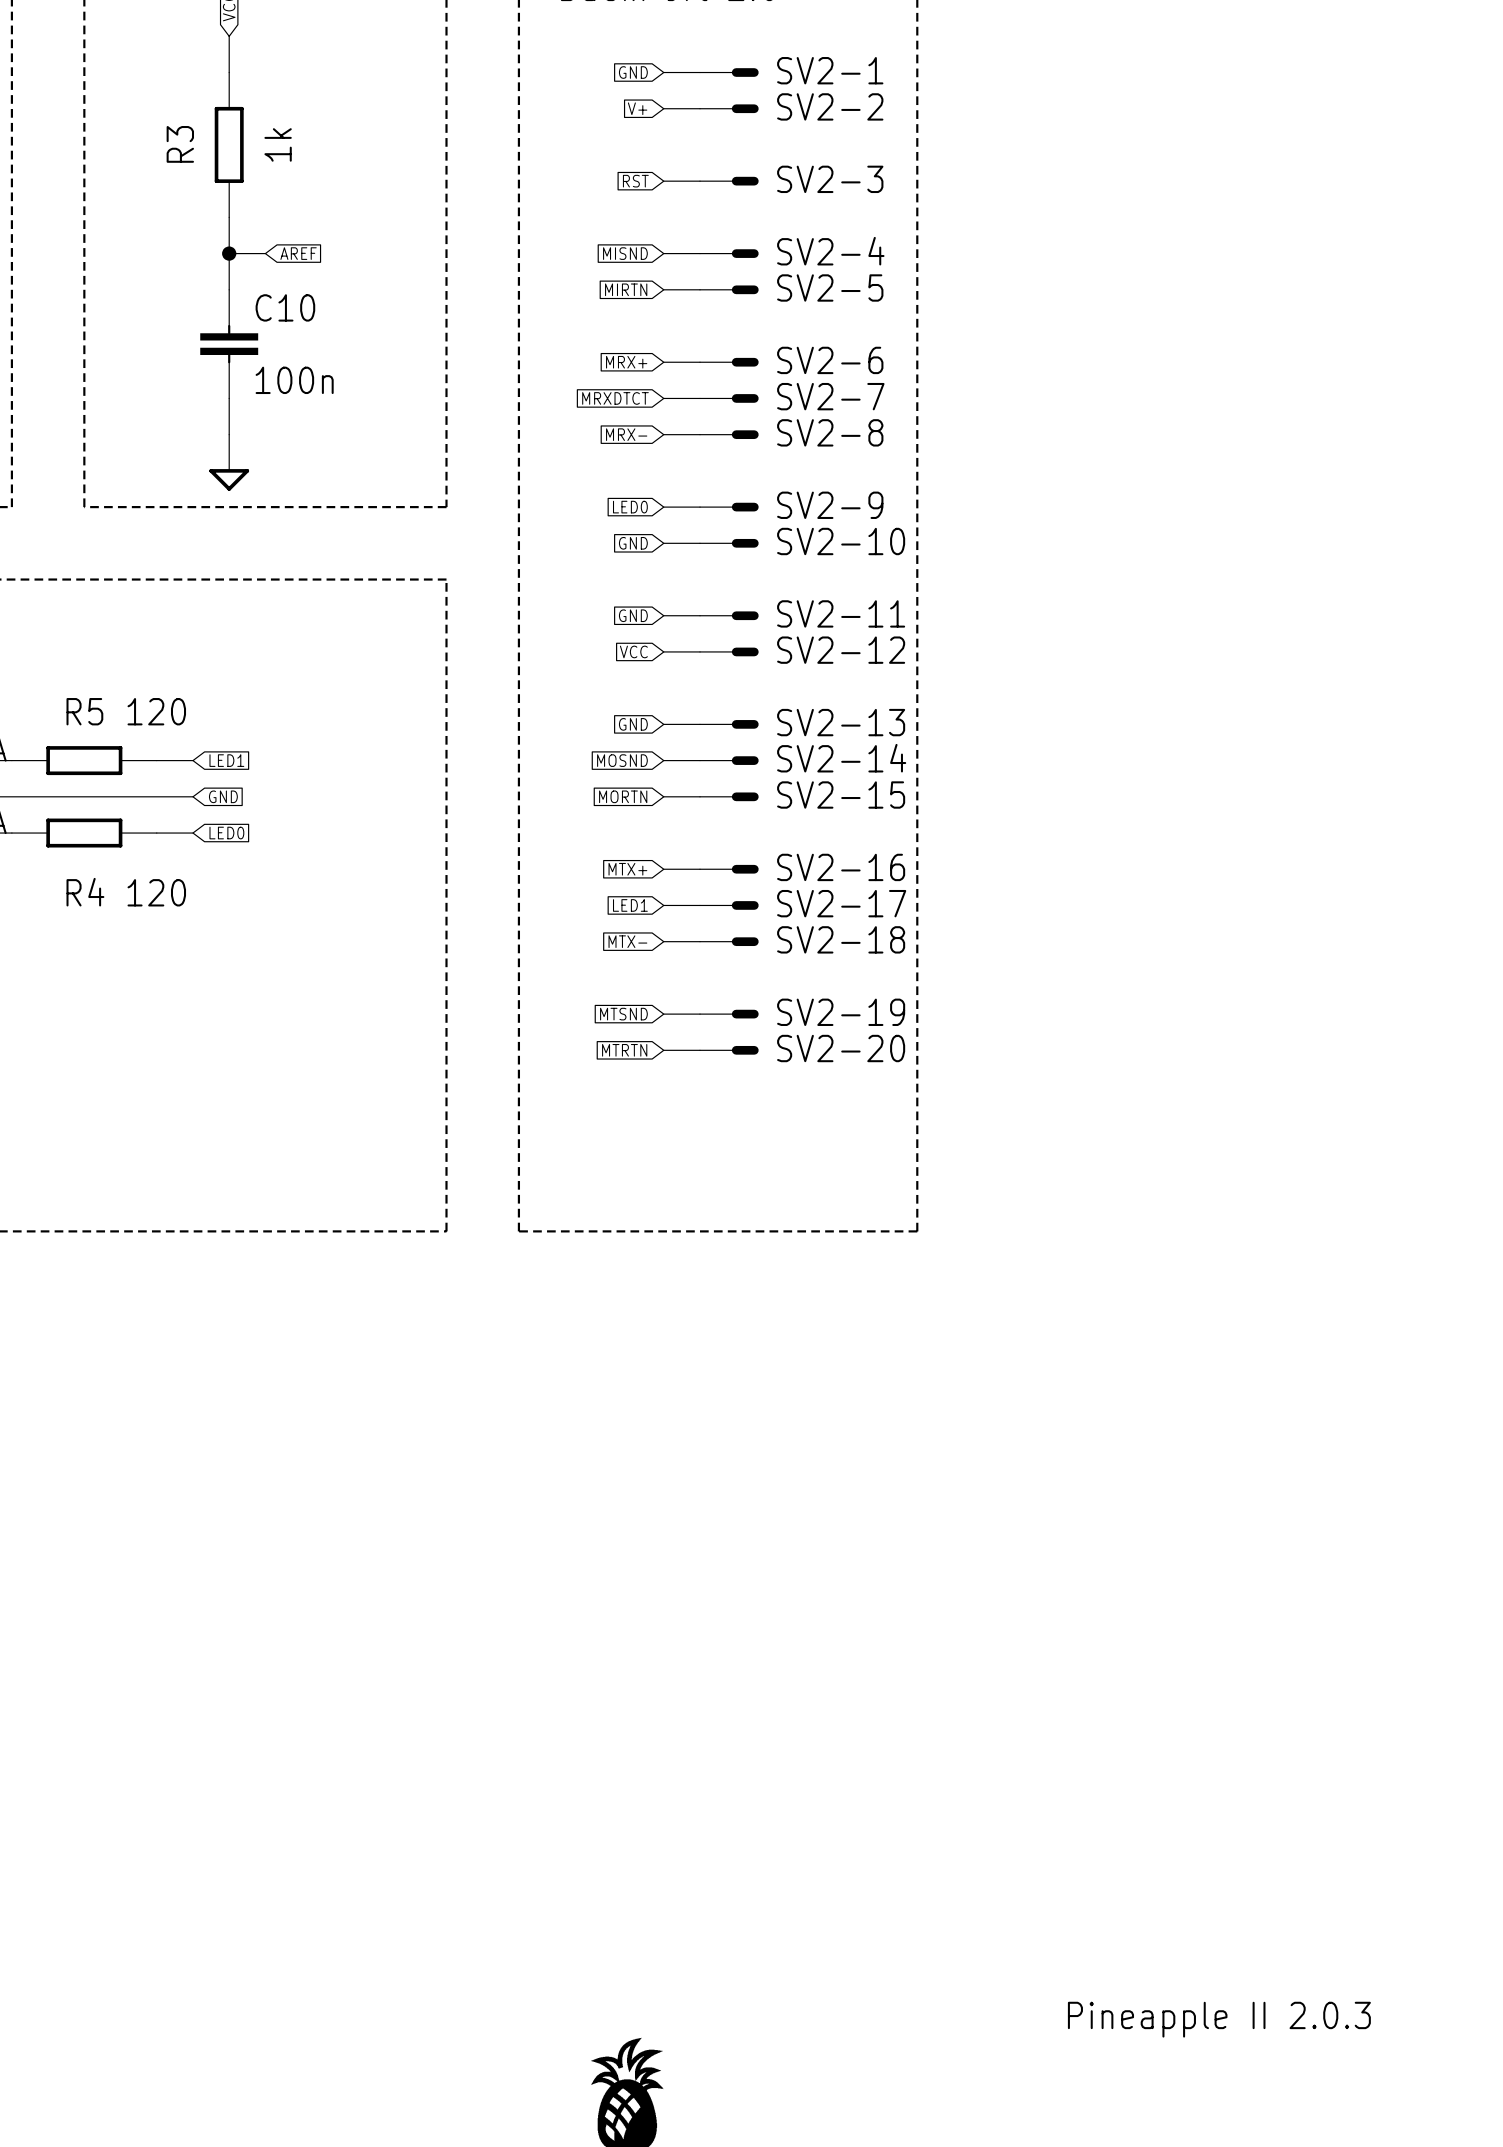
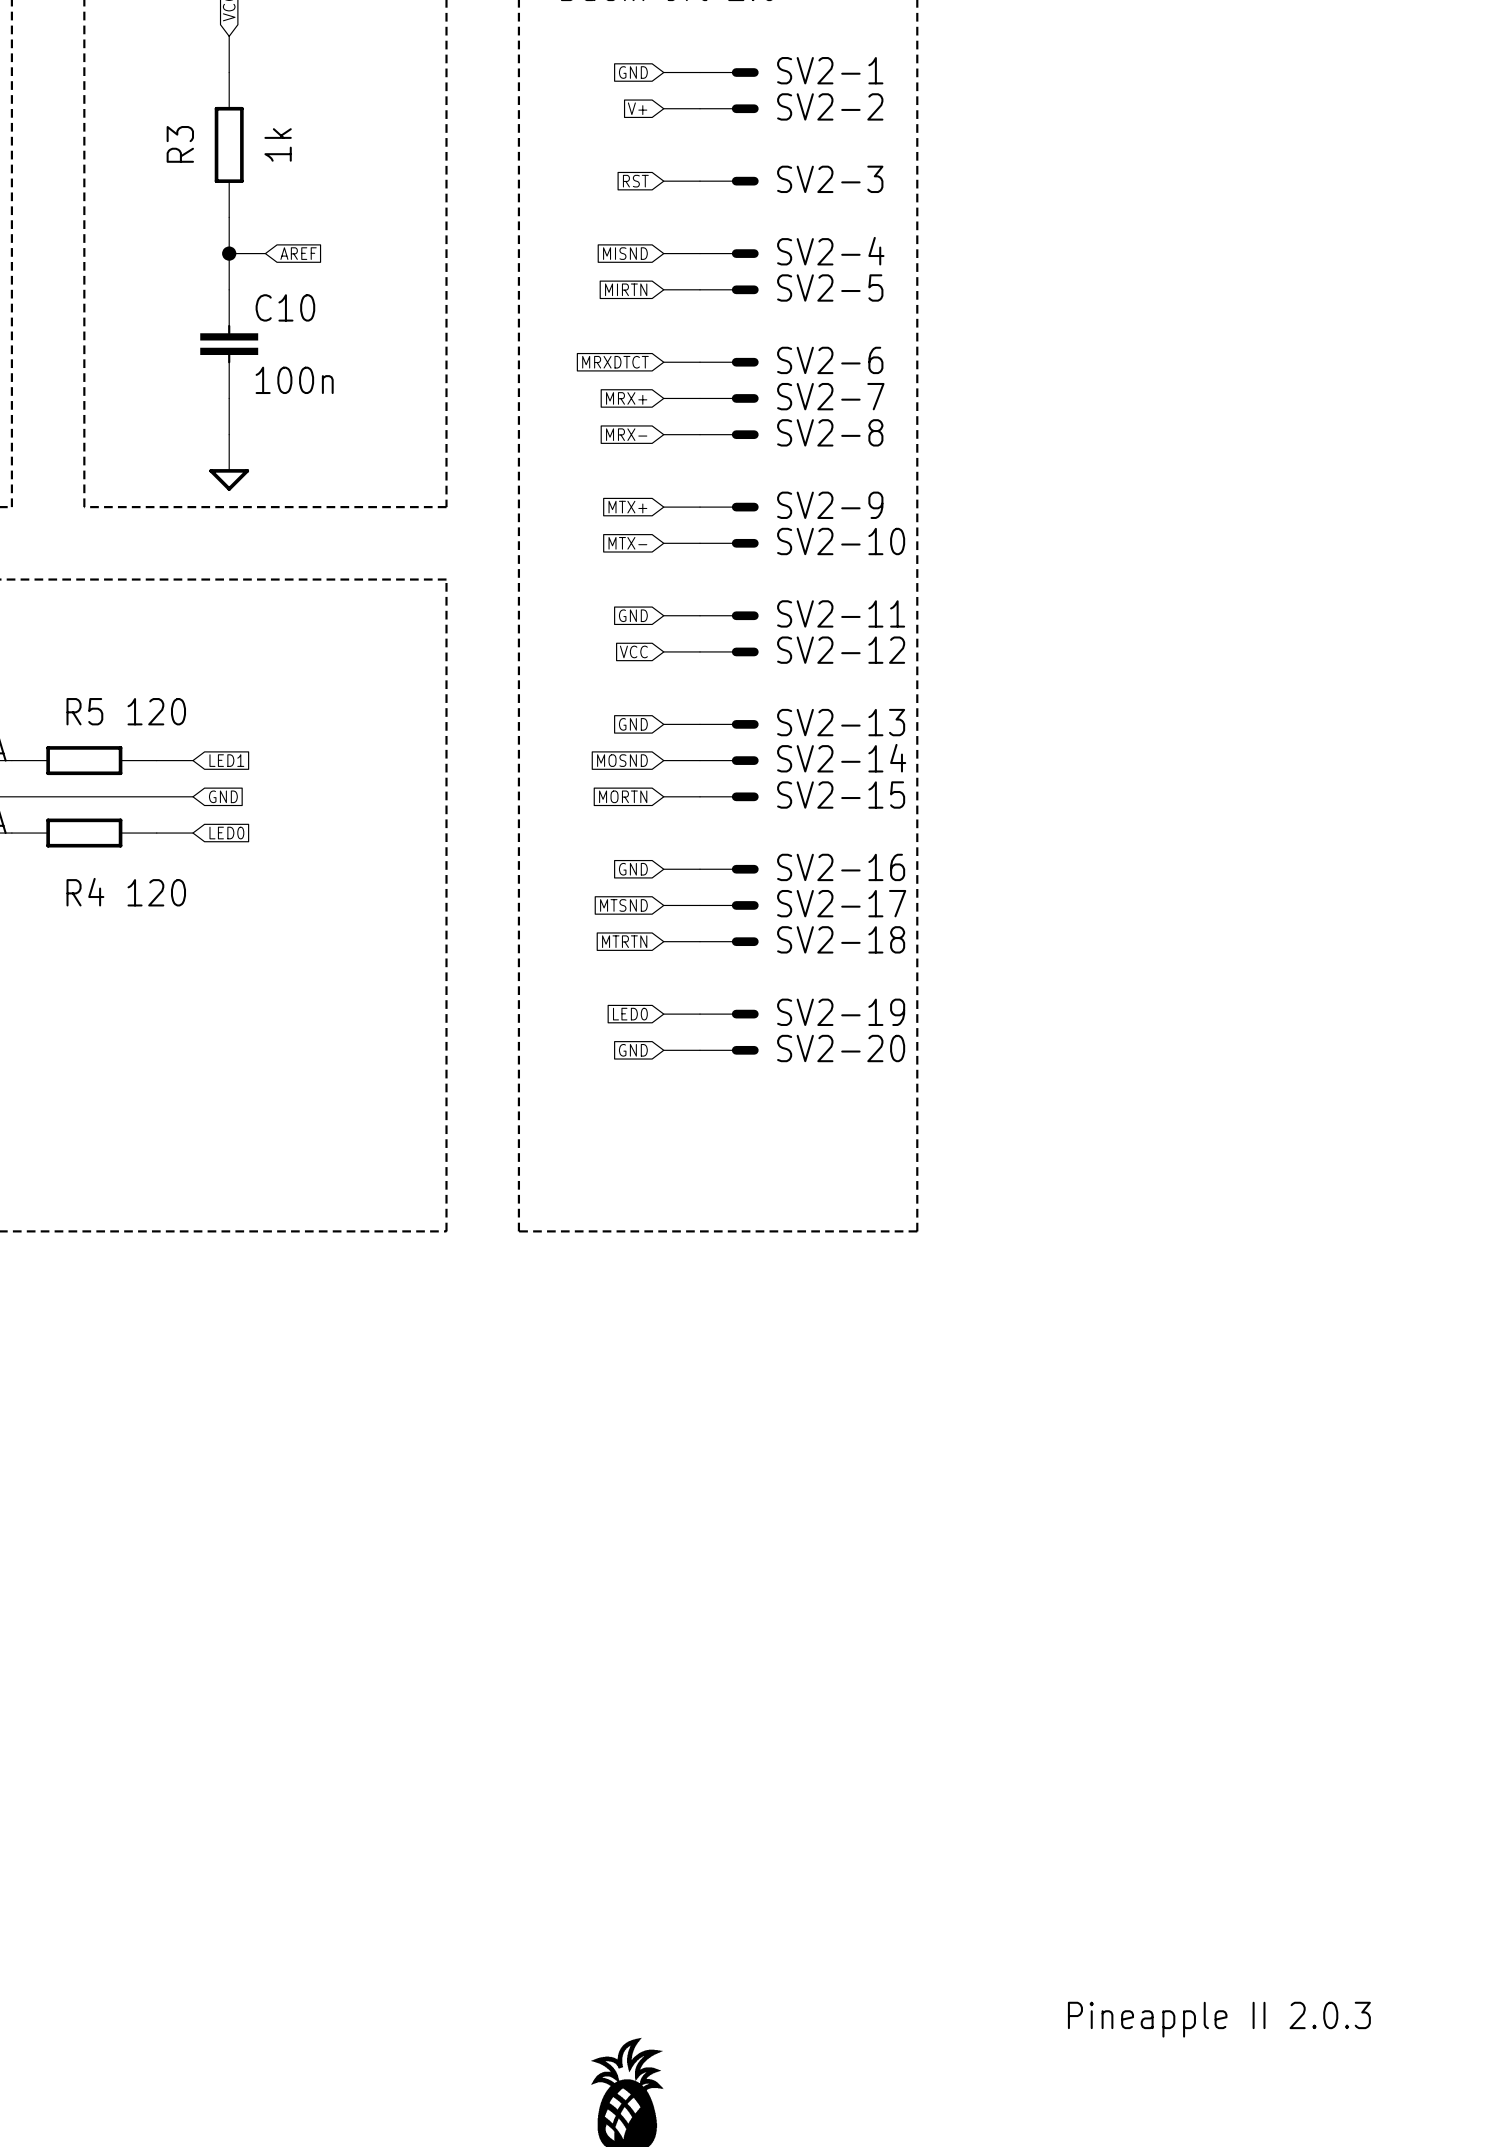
global label: MRX+ (626, 362) -> MRXDTCT (615, 362)
global label: MRXDTCT (615, 398) -> MRX+ (626, 398)
global label: LED0 (630, 507) -> MTX+ (627, 507)
global label: GND (633, 543) -> MTX- (627, 543)
global label: MTX+ (627, 869) -> GND (633, 869)
global label: LED1 (630, 905) -> MTSND (623, 905)
global label: MTX- (627, 941) -> MTRTN (624, 941)
global label: MTSND (623, 1014) -> LED0 (630, 1014)
global label: MTRTN (624, 1050) -> GND (633, 1050)

